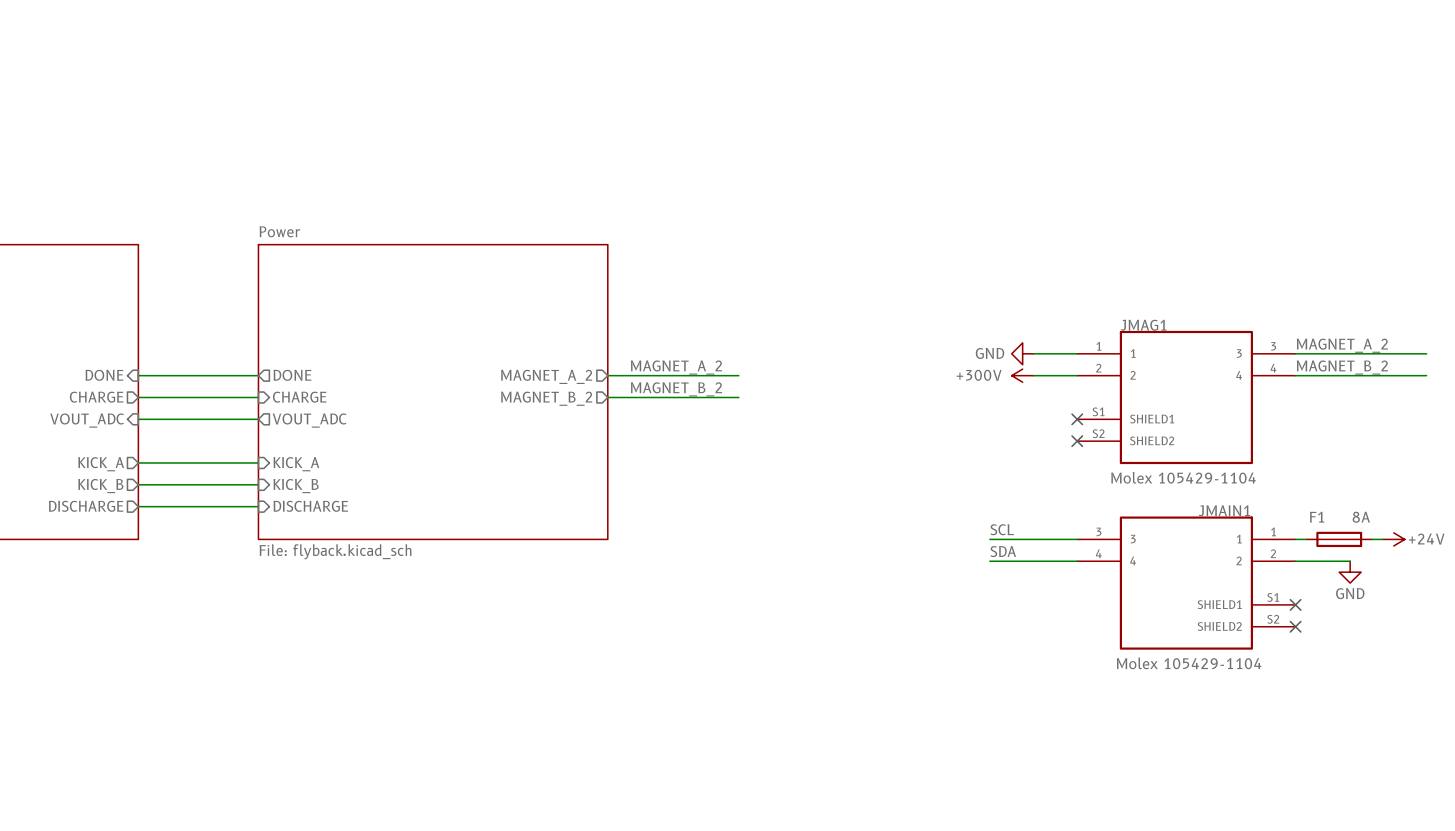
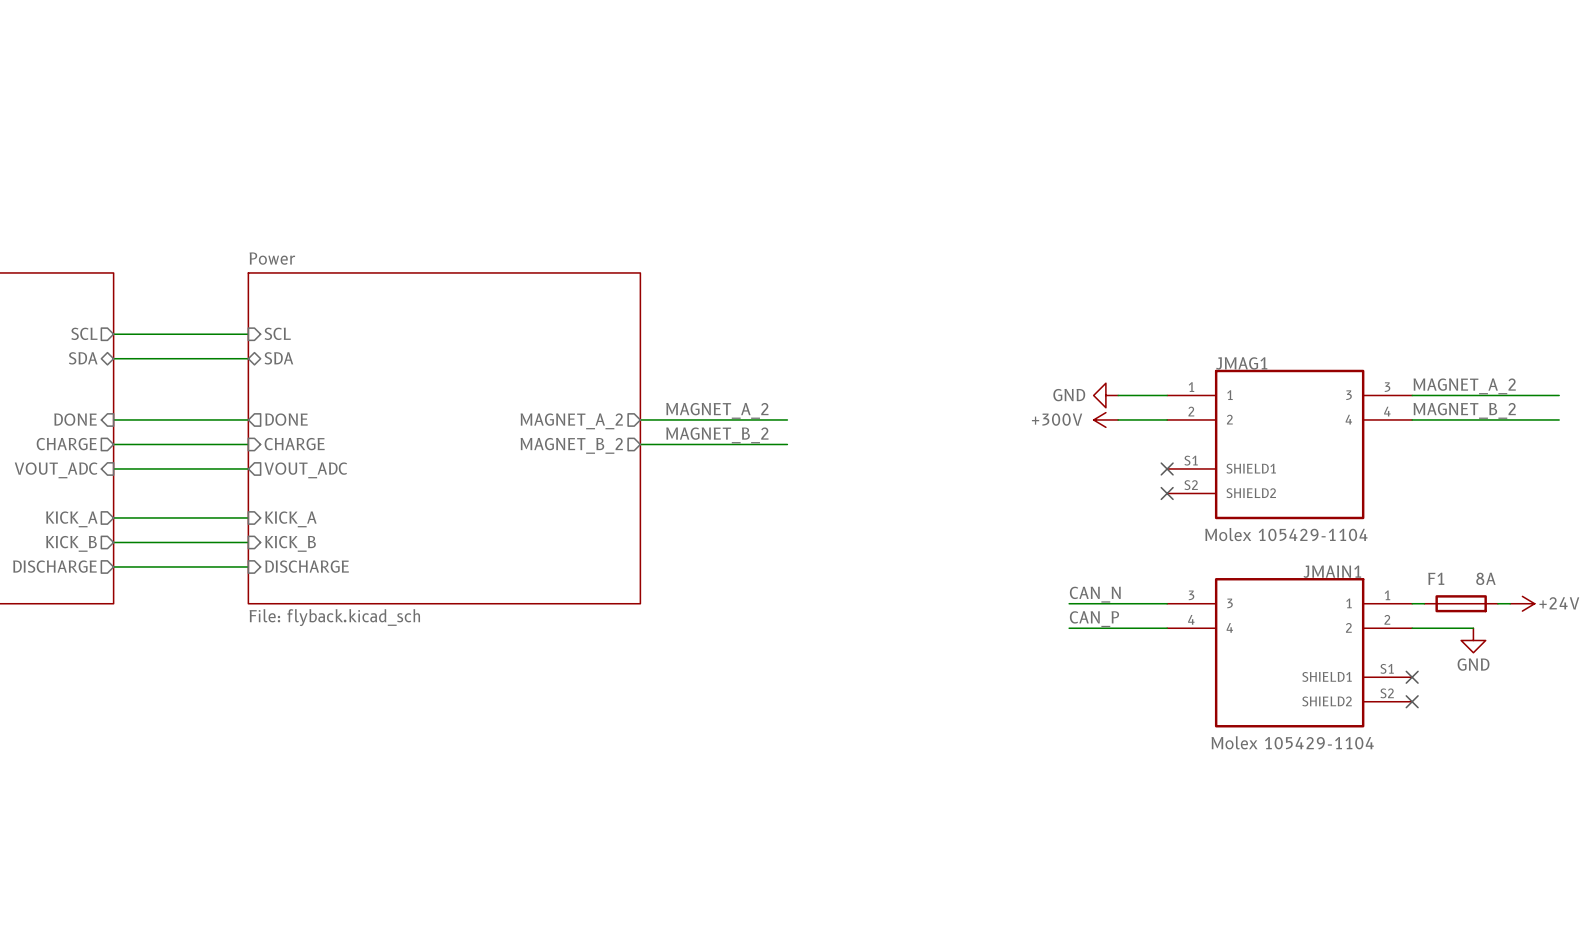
sheet pin: none -> SCL (84, 333)
sheet pin: none -> SCL (277, 333)
wire: none -> (113, 334) (248, 334)
sheet pin: none -> SDA (83, 358)
sheet pin: none -> SDA (278, 358)
wire: none -> (113, 358) (248, 358)
label: SCL (1002, 529) -> CAN_N (1095, 594)
label: SDA (1003, 551) -> CAN_P (1094, 619)

